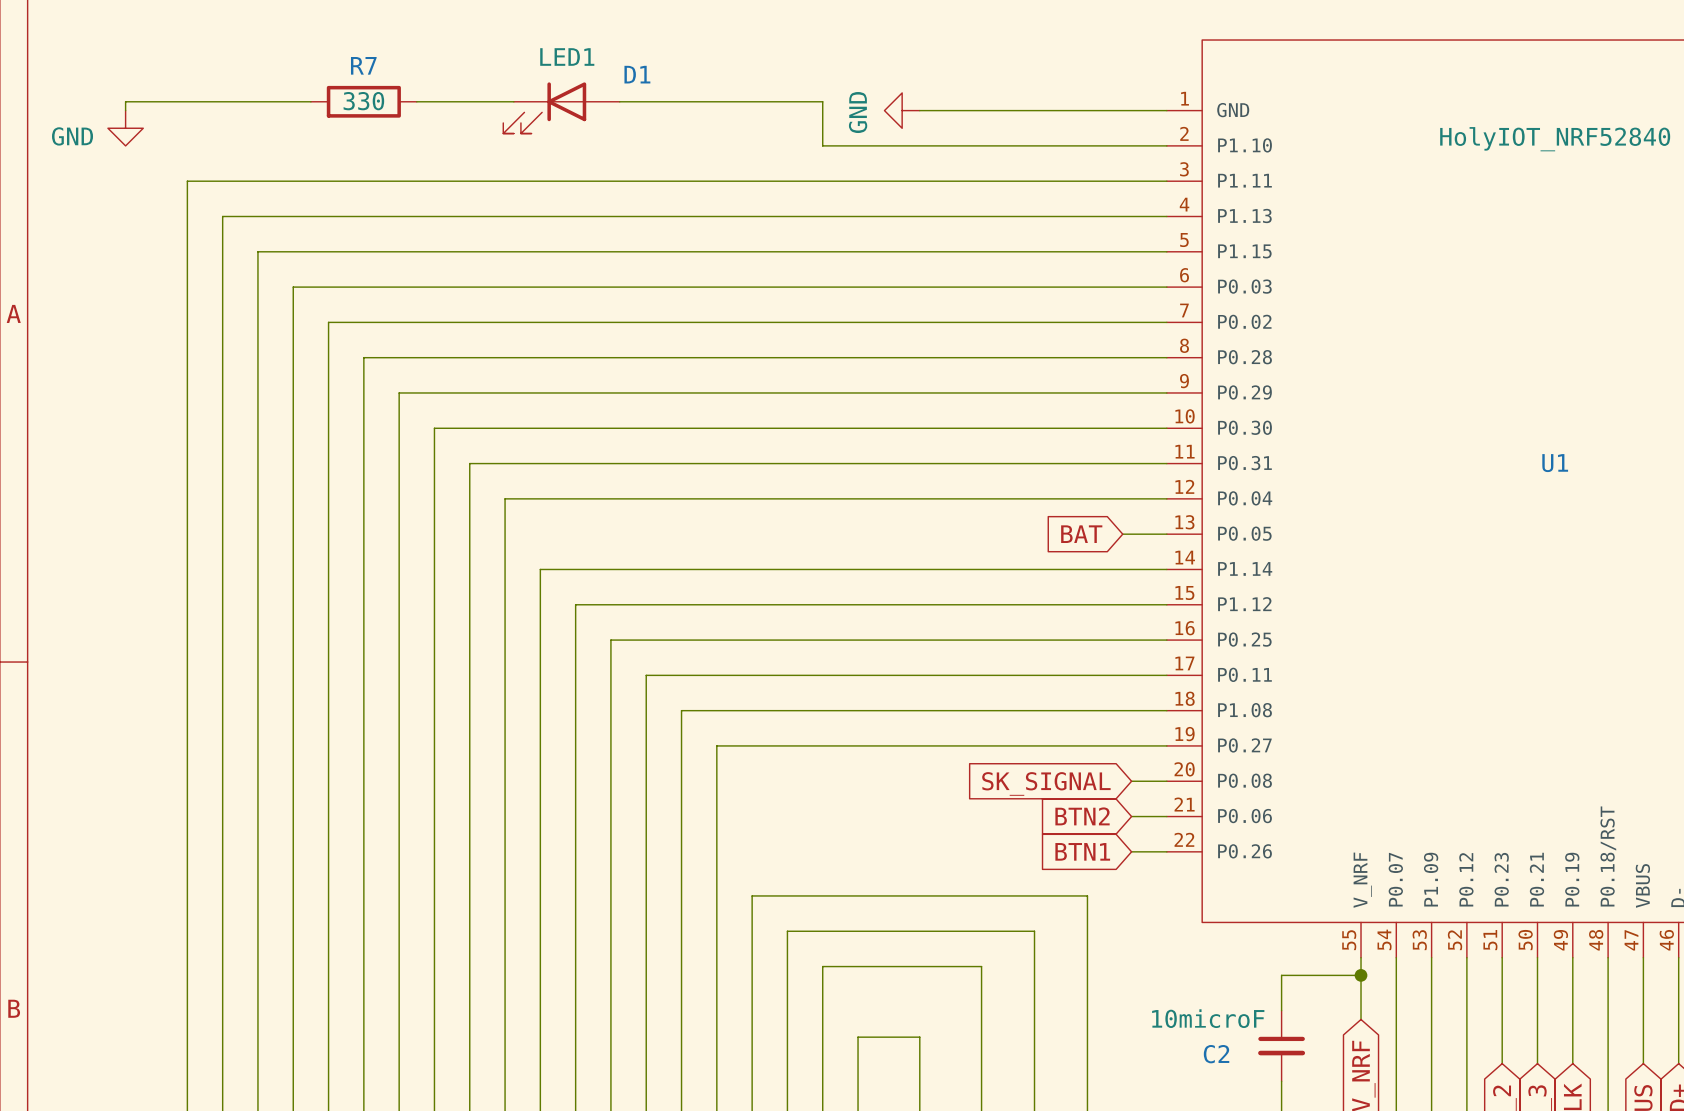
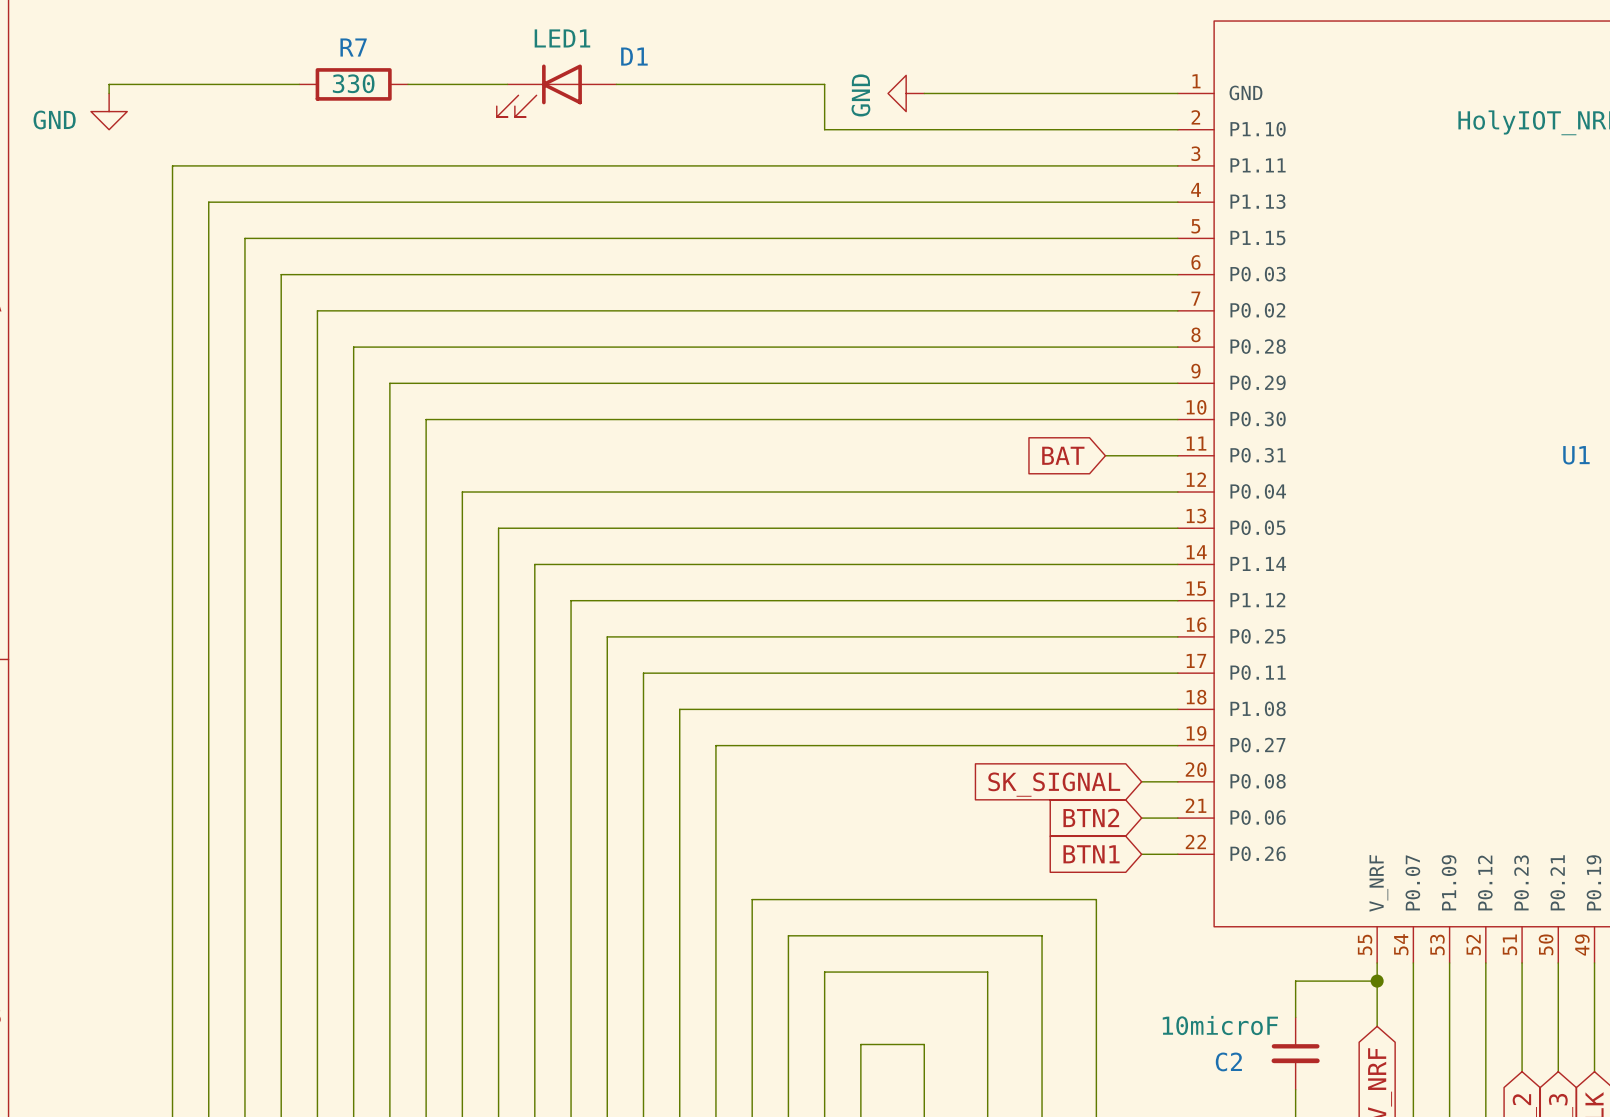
wire: (1096, 463) (469, 463) (469, 498) -> none
wire: (505, 498) (505, 534) -> (498, 492) (462, 492)
wire: none -> (498, 528) (1132, 528)
global label position: BAT (1081, 534) -> BAT (1063, 455)

